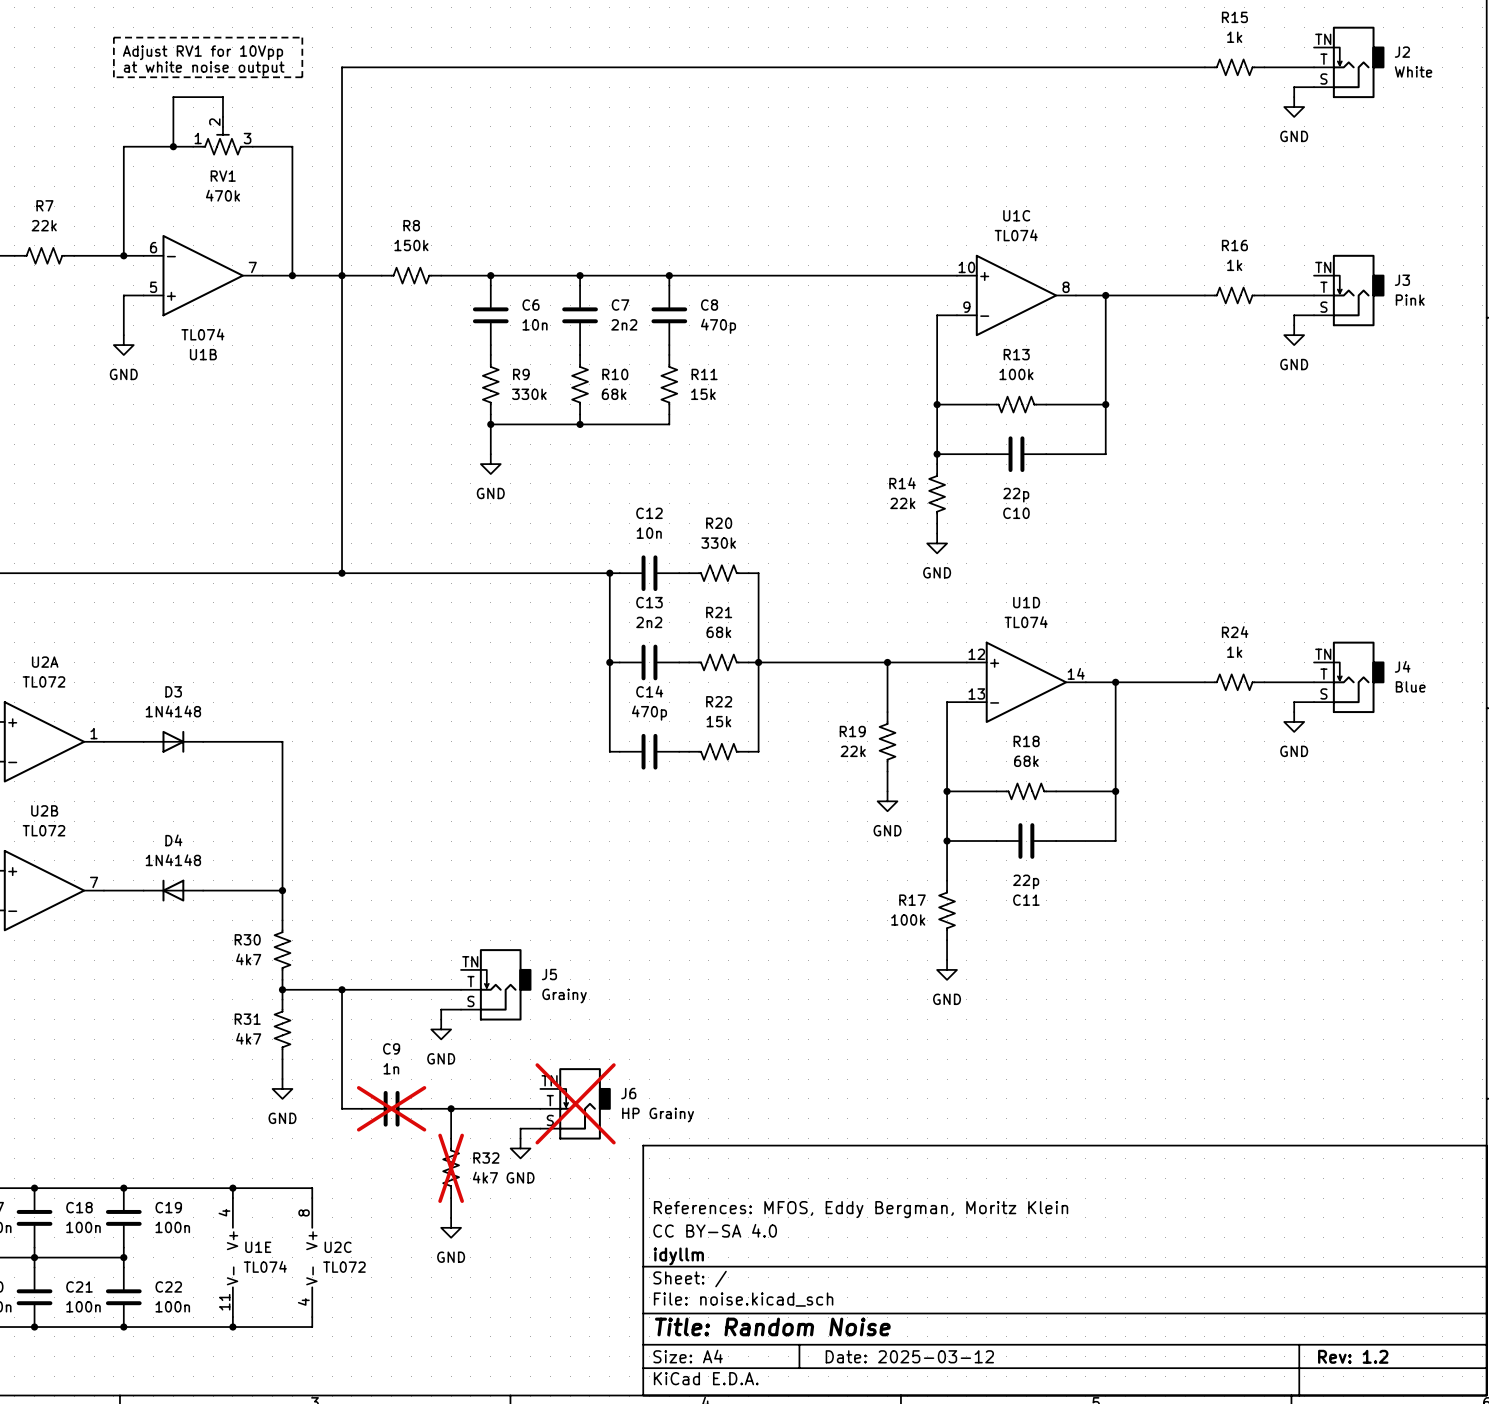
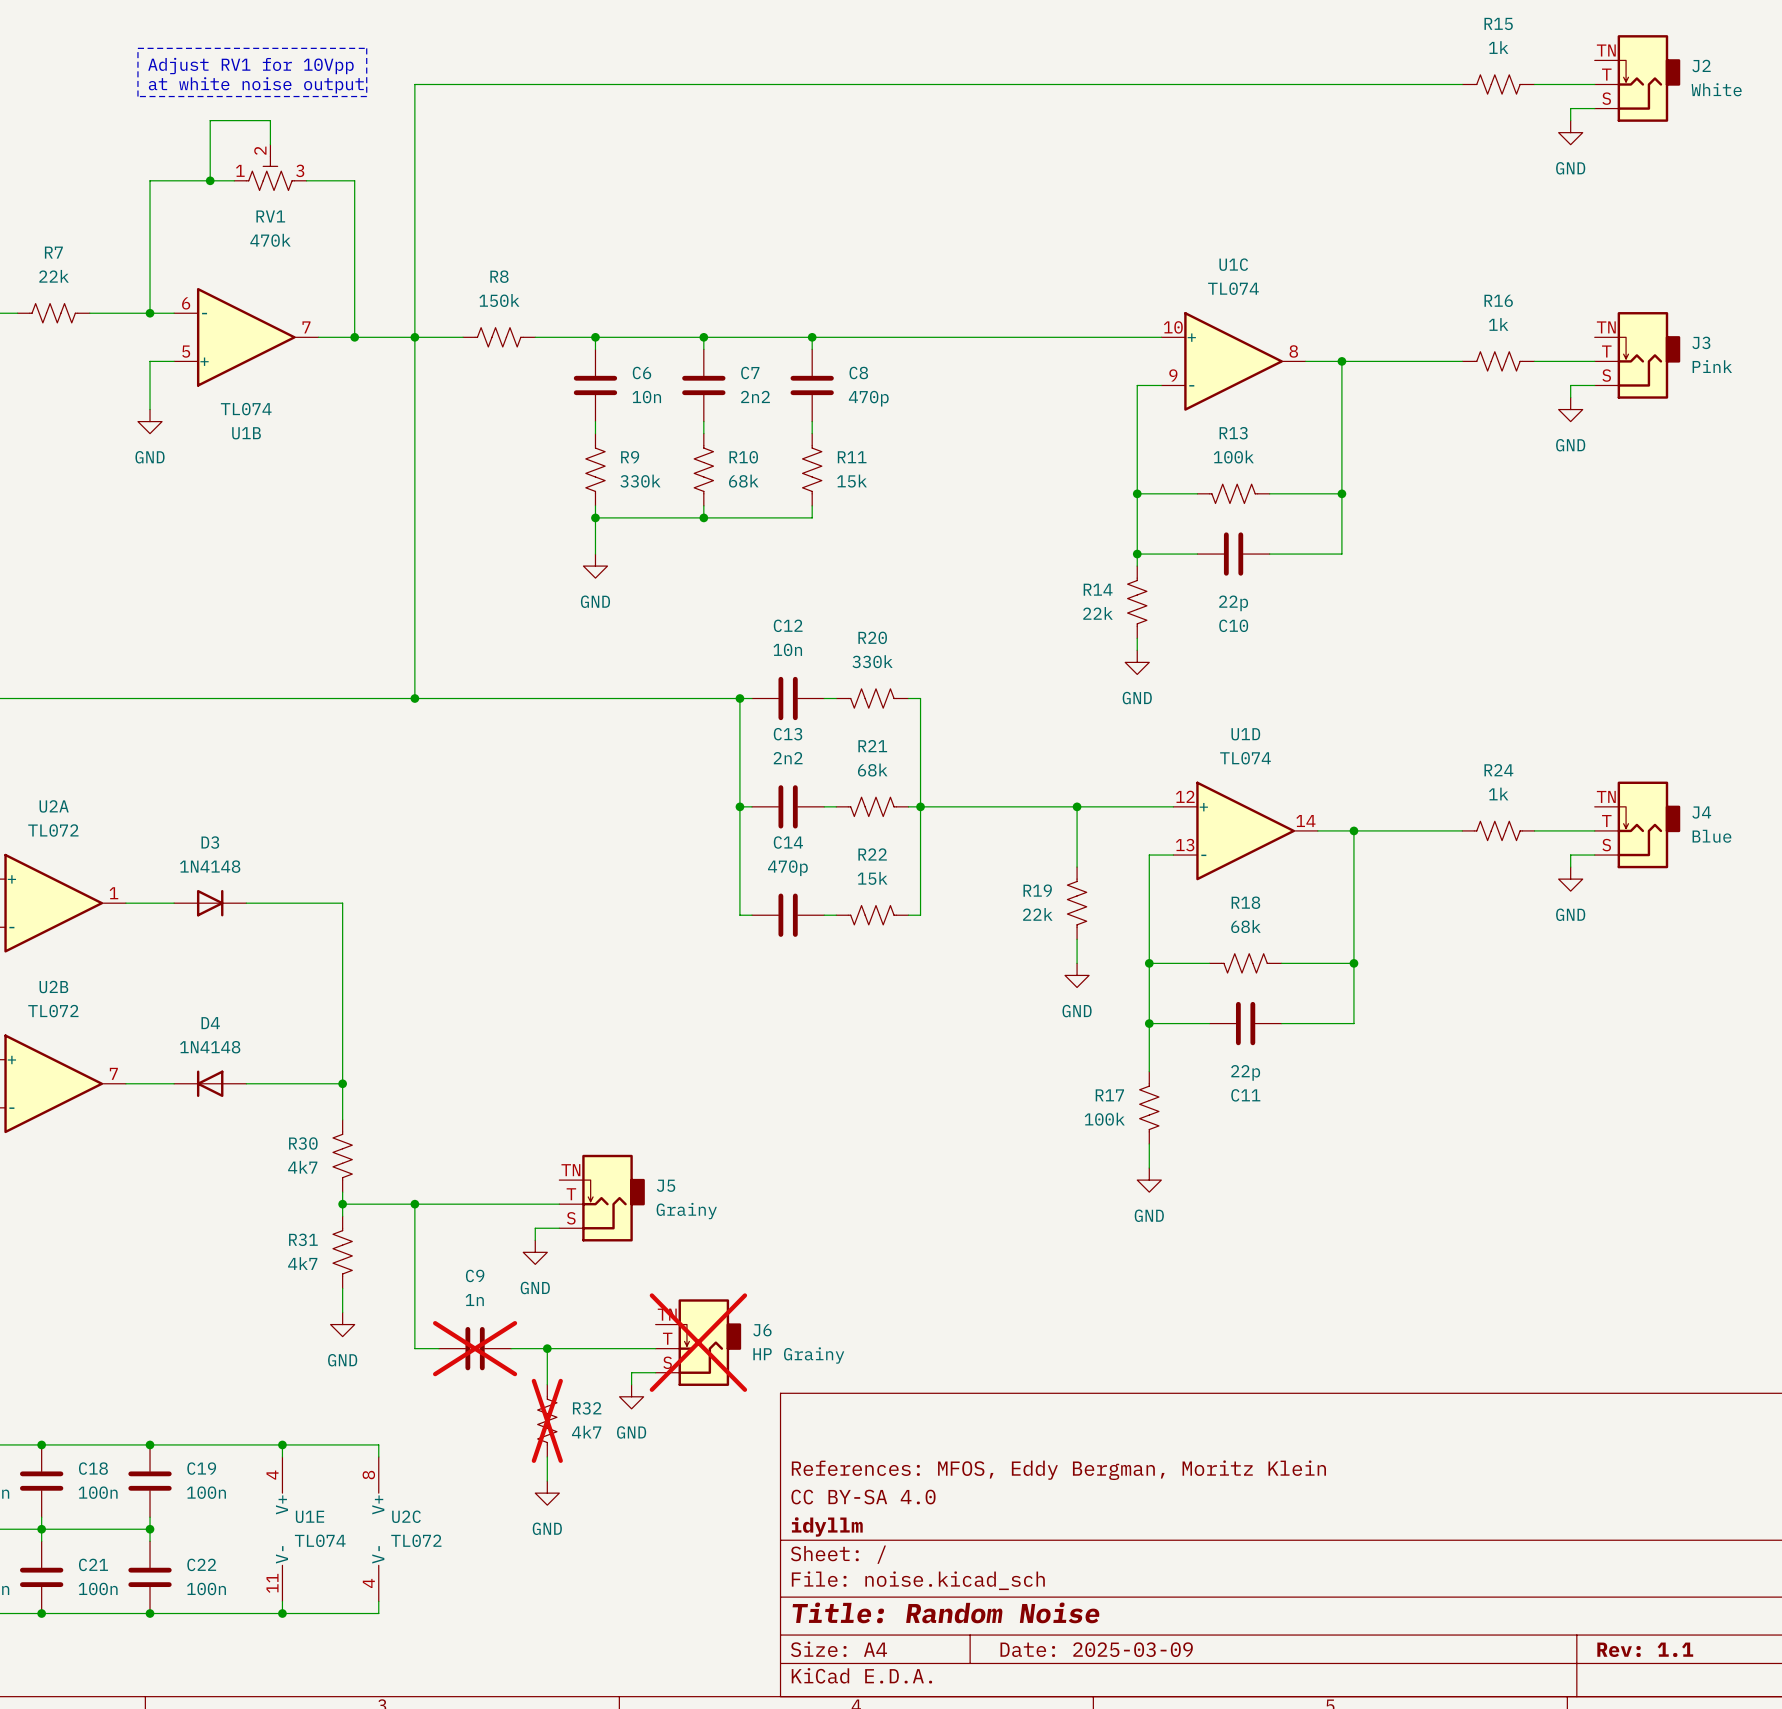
title block: Date: 2025-03-12 (909, 1356) -> Date: 2025-03-09 (1096, 1649)
title block: Rev: 1.2 (1353, 1356) -> Rev: 1.1 (1645, 1649)

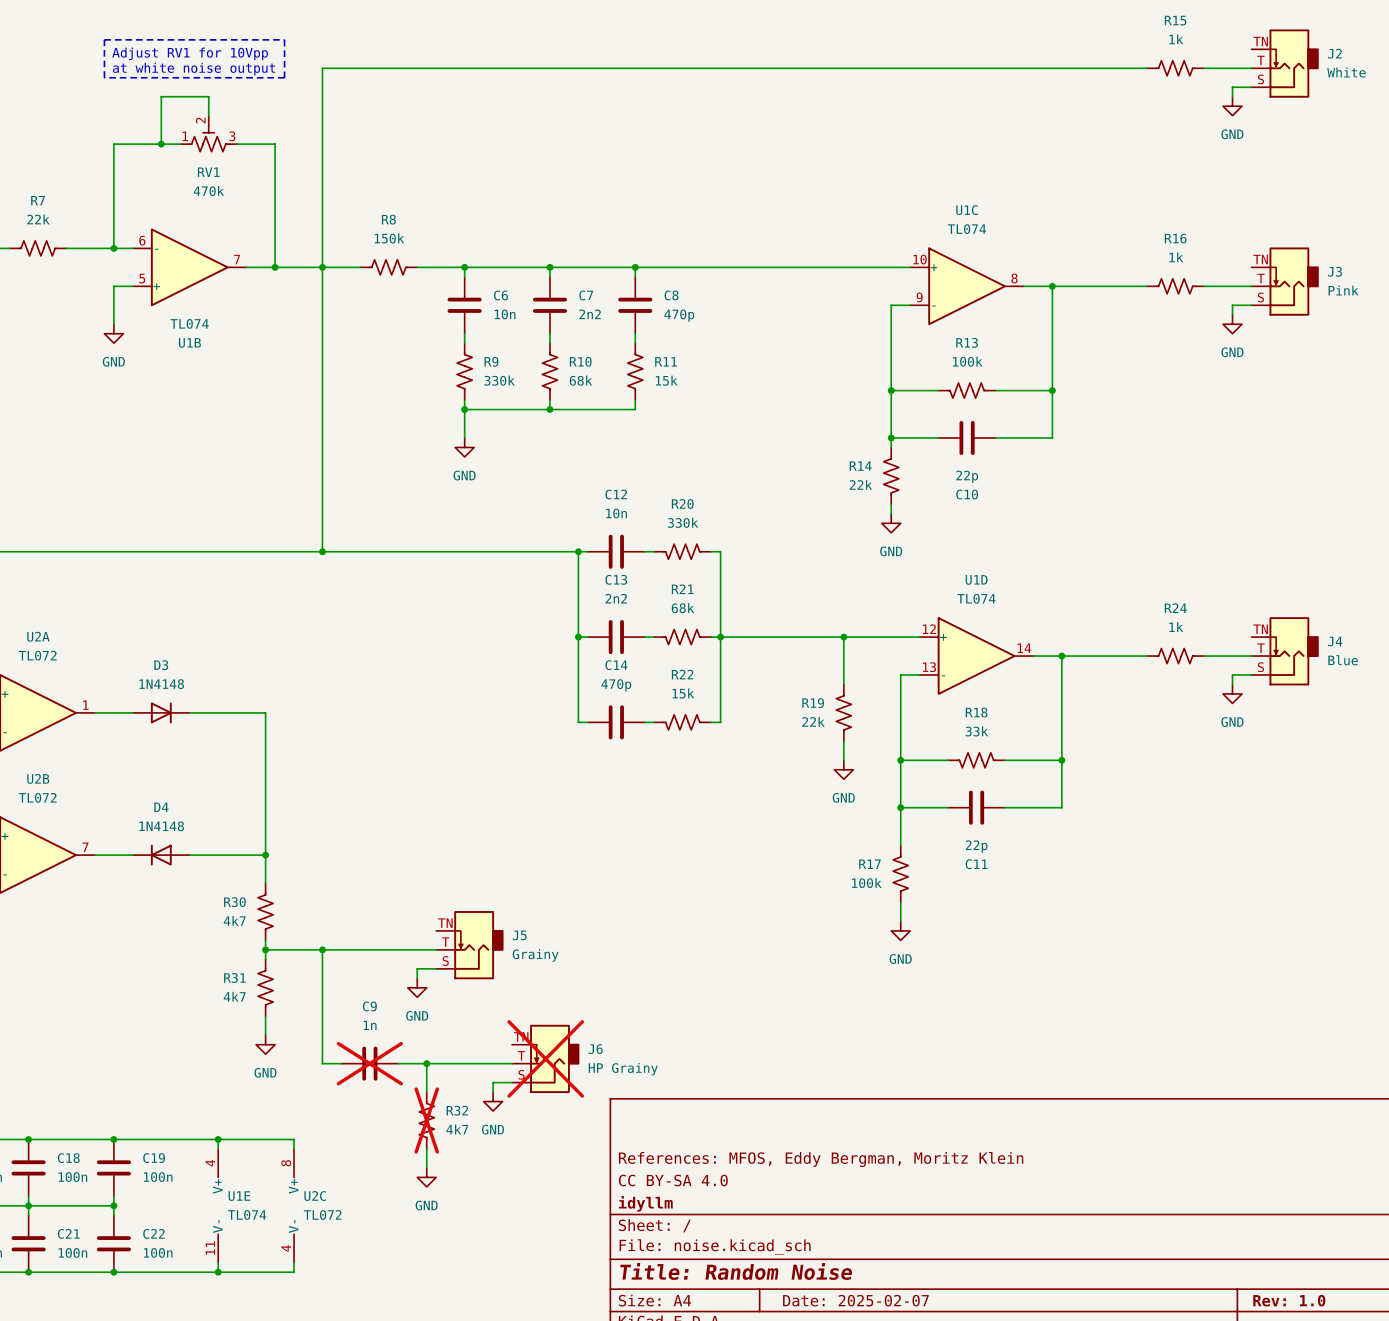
R18 value: 68k (1245, 926) -> 33k (976, 731)
title block: Date: 2025-03-09 (1096, 1649) -> Date: 2025-02-07 (855, 1300)
title block: Rev: 1.1 (1645, 1649) -> Rev: 1.0 (1289, 1300)

